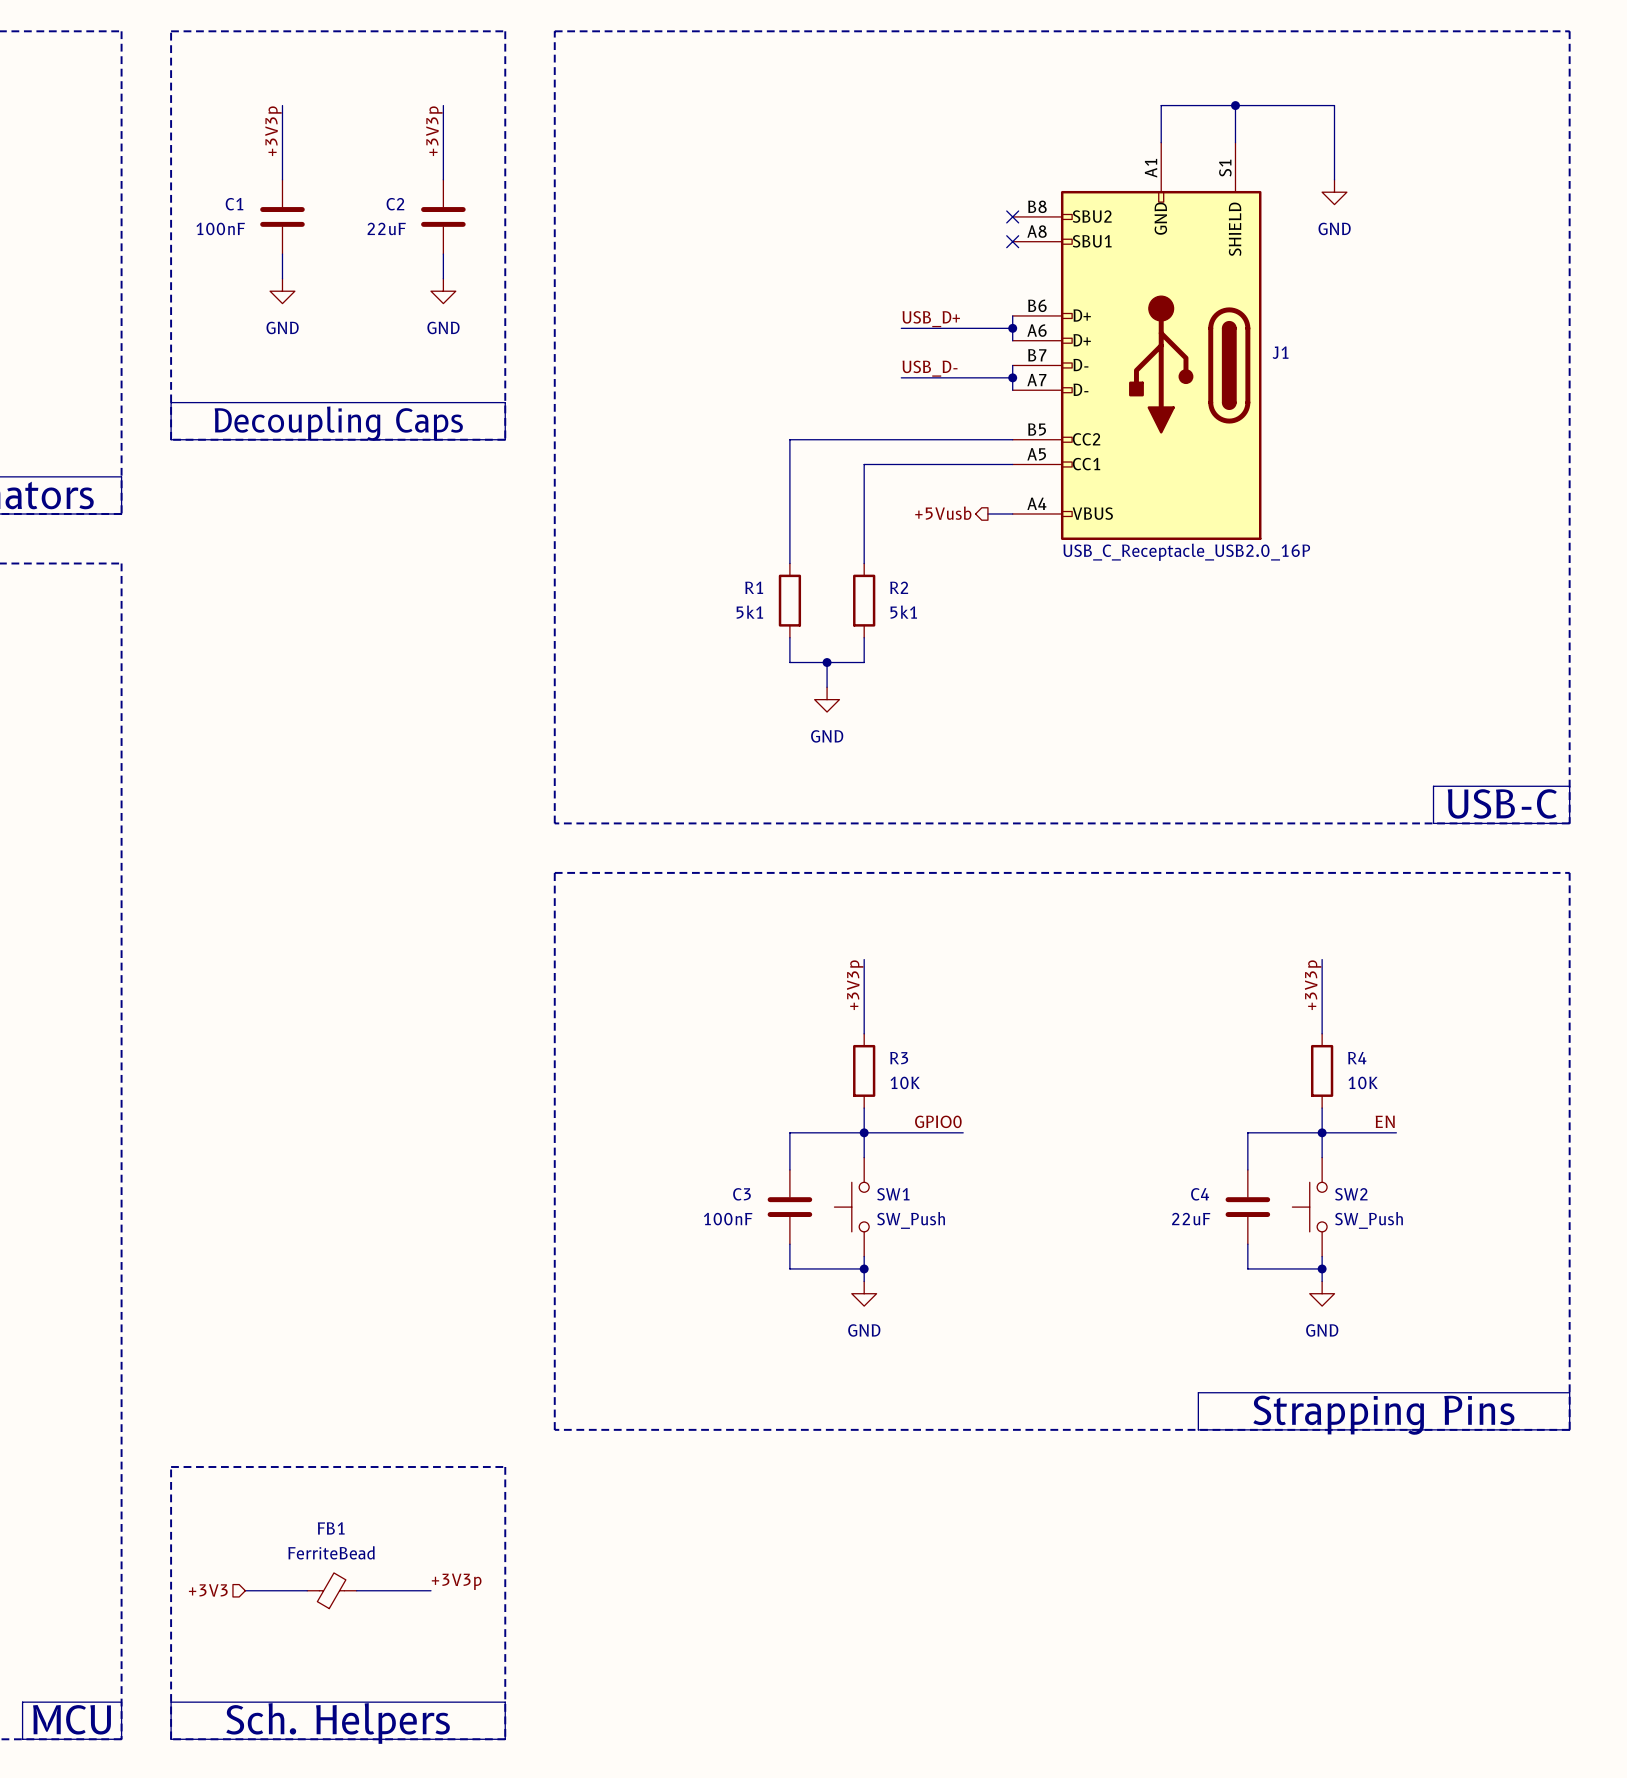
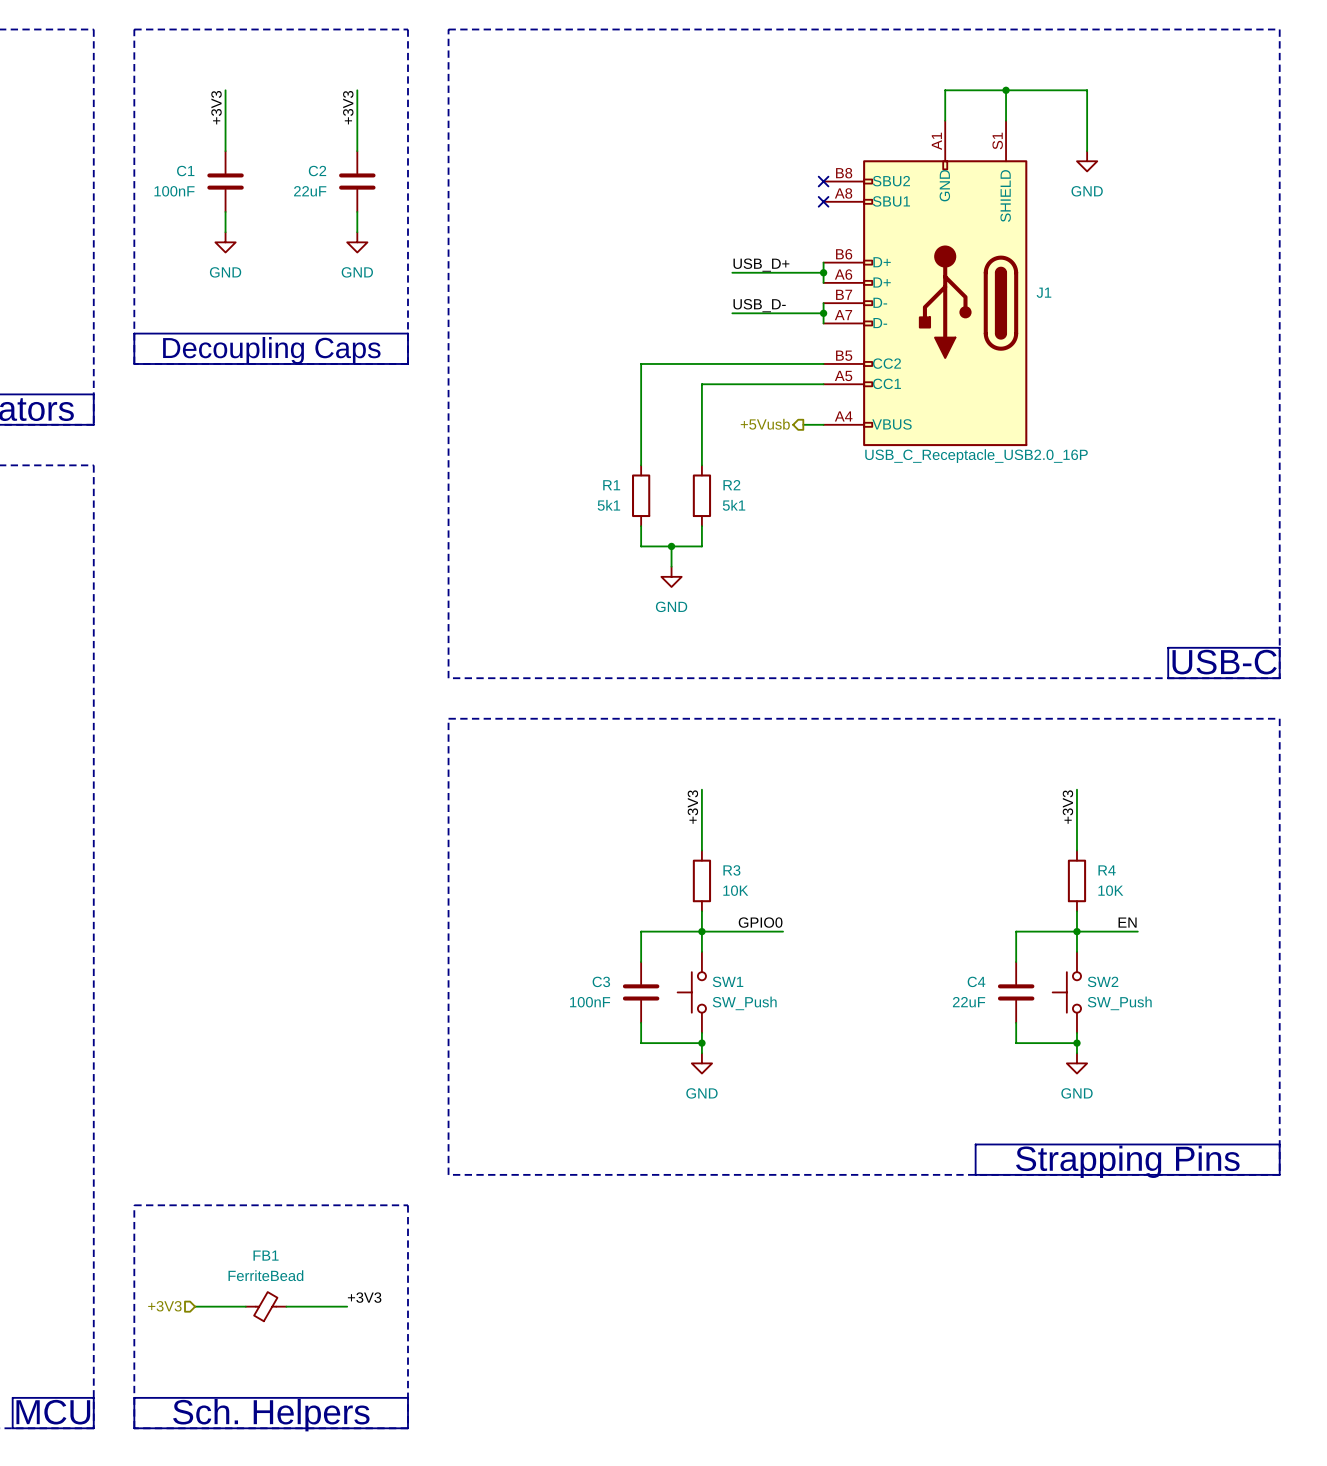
label: +3V3p (273, 131) -> +3V3 (216, 107)
label: +3V3p (434, 131) -> +3V3 (348, 107)
label: +3V3p (855, 985) -> +3V3 (692, 807)
label: +3V3p (1313, 985) -> +3V3 (1067, 807)
label: +3V3p (456, 1581) -> +3V3 (364, 1297)

